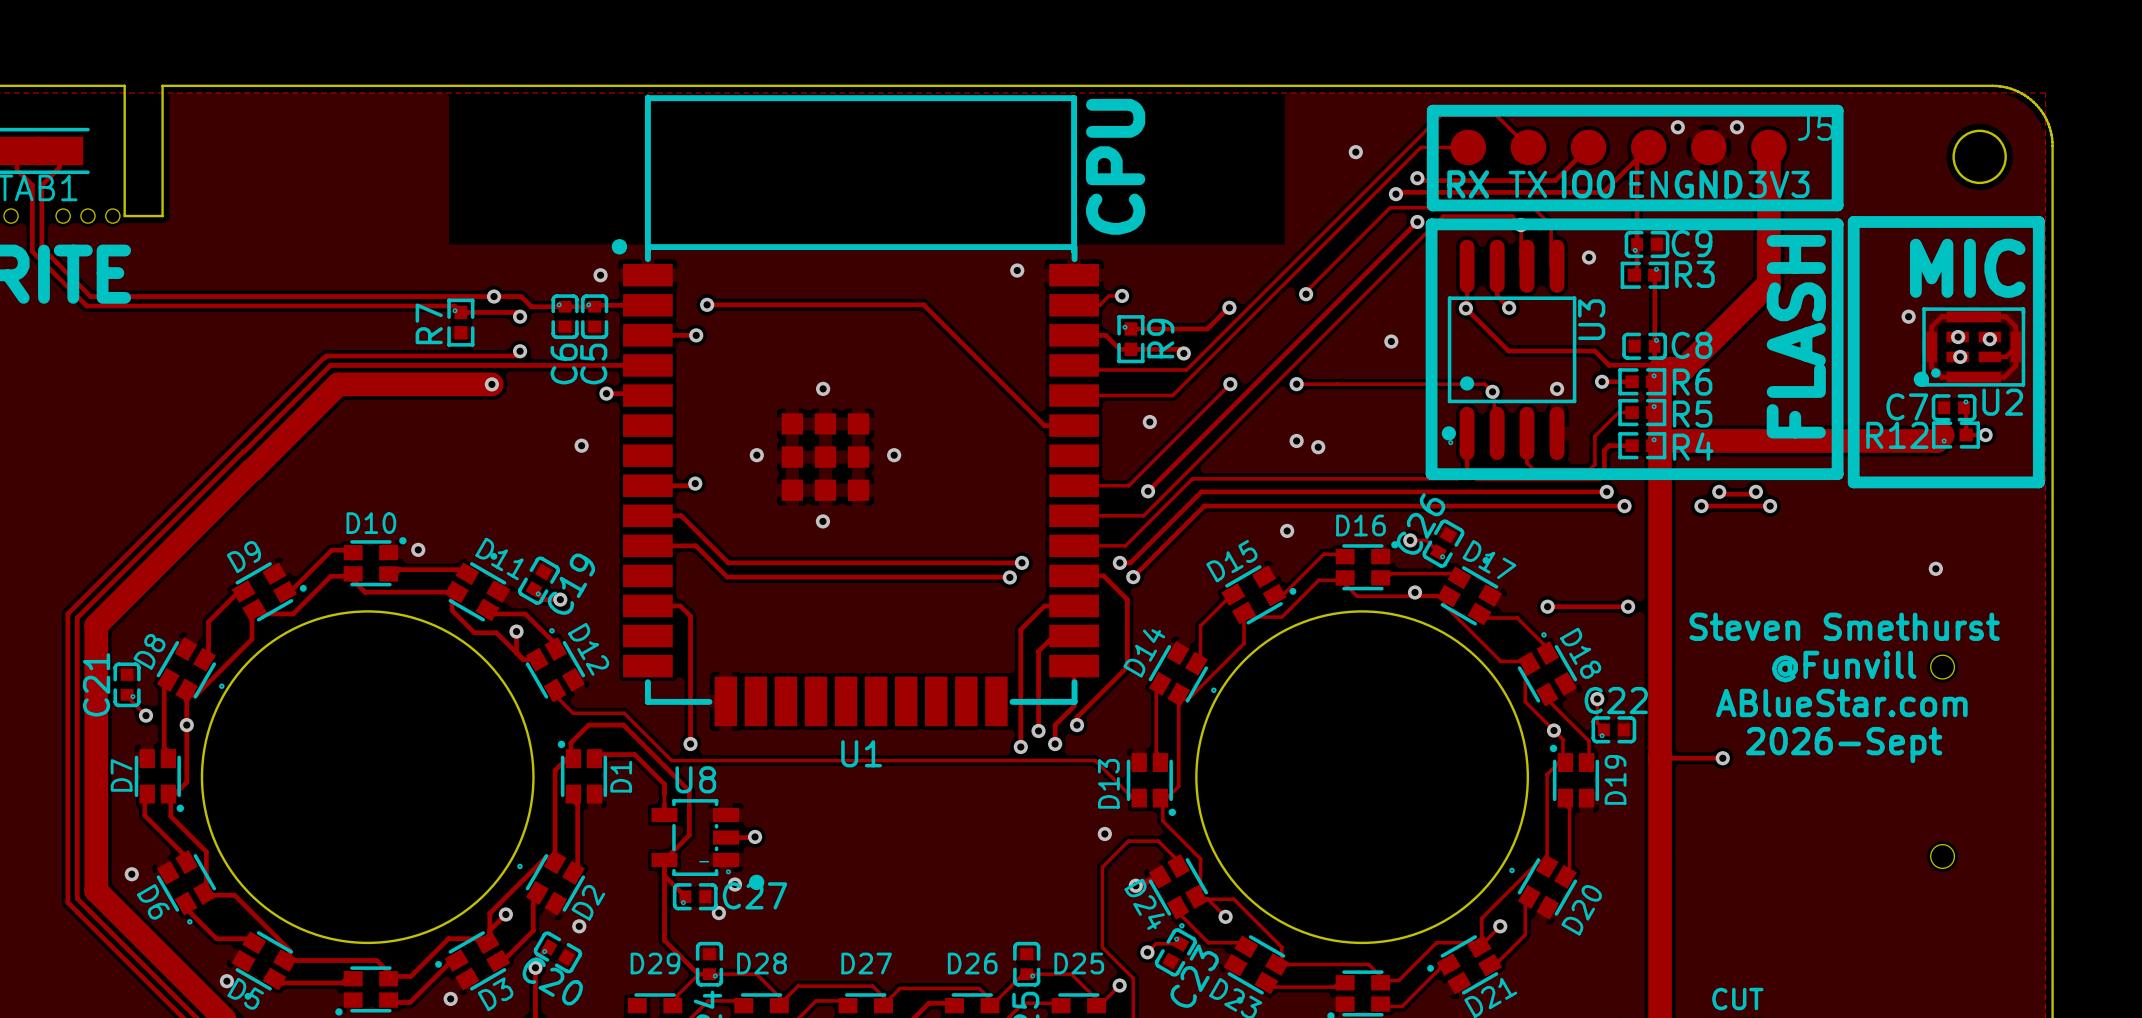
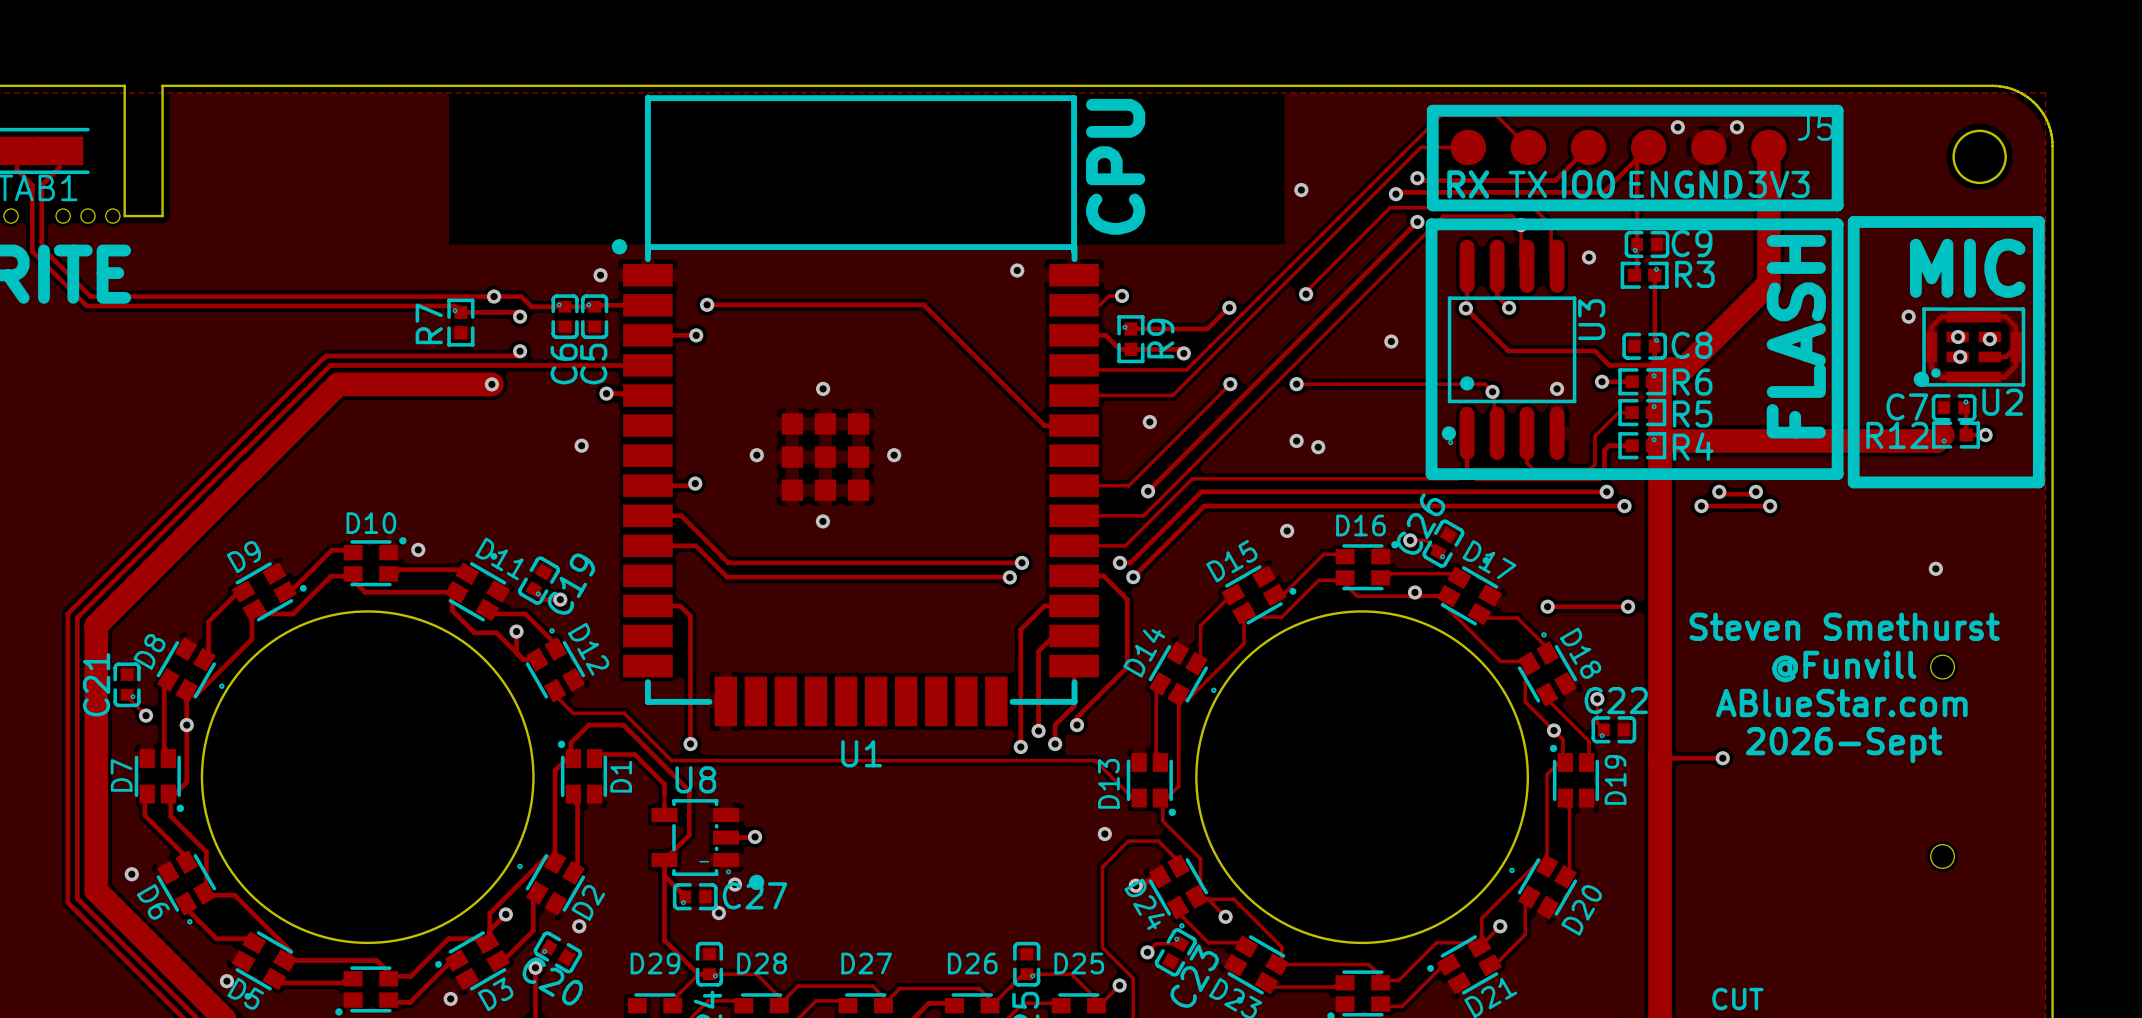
via position: (1355, 152) -> (1301, 190)

